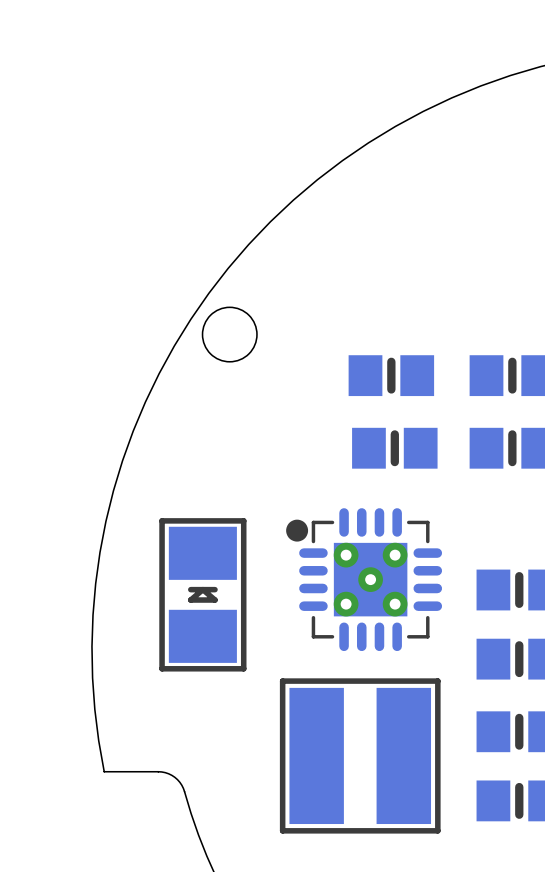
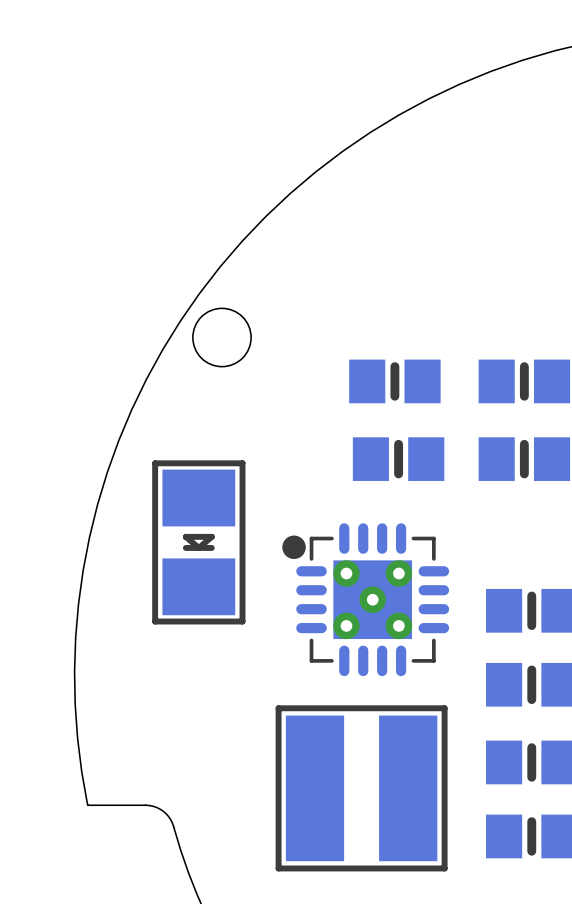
part rotation: 0° (202, 594) -> 180° (198, 542)

